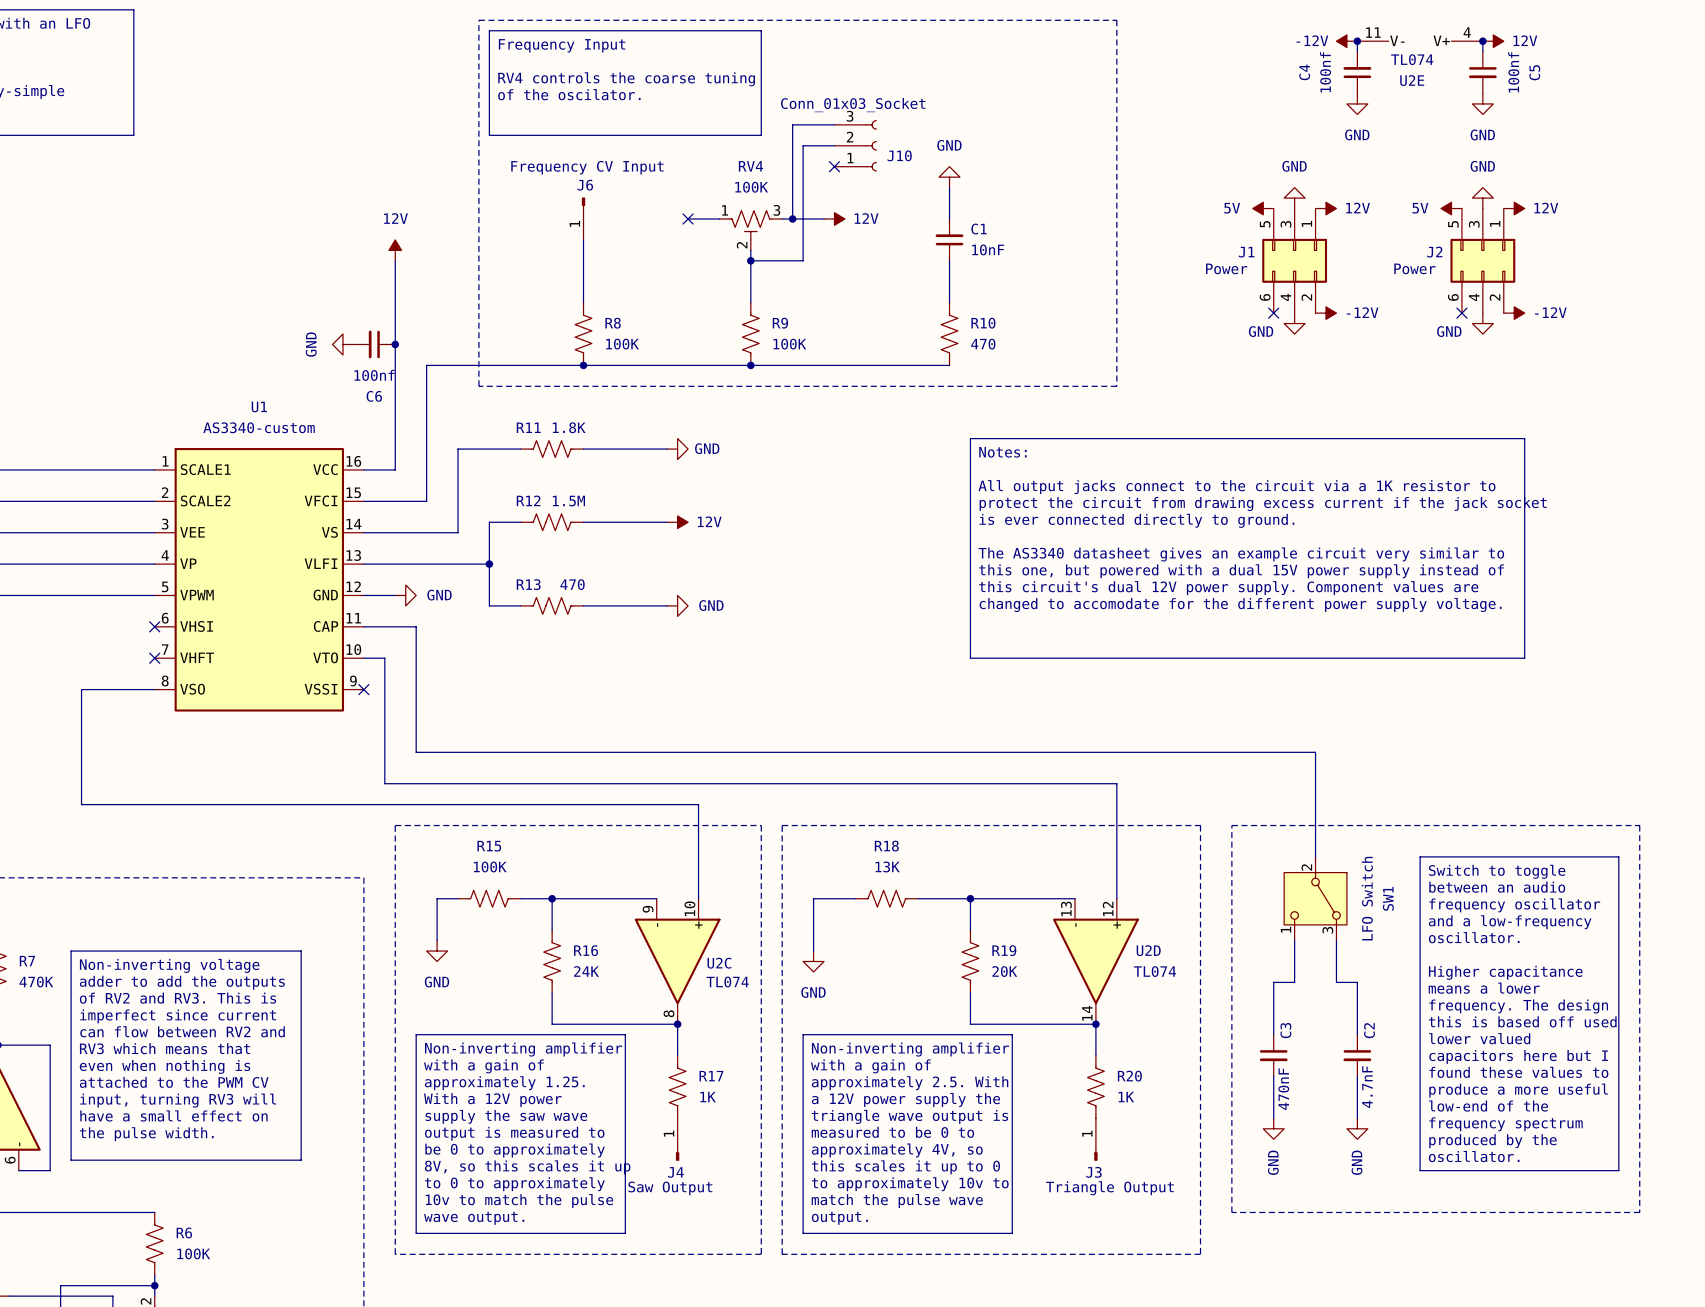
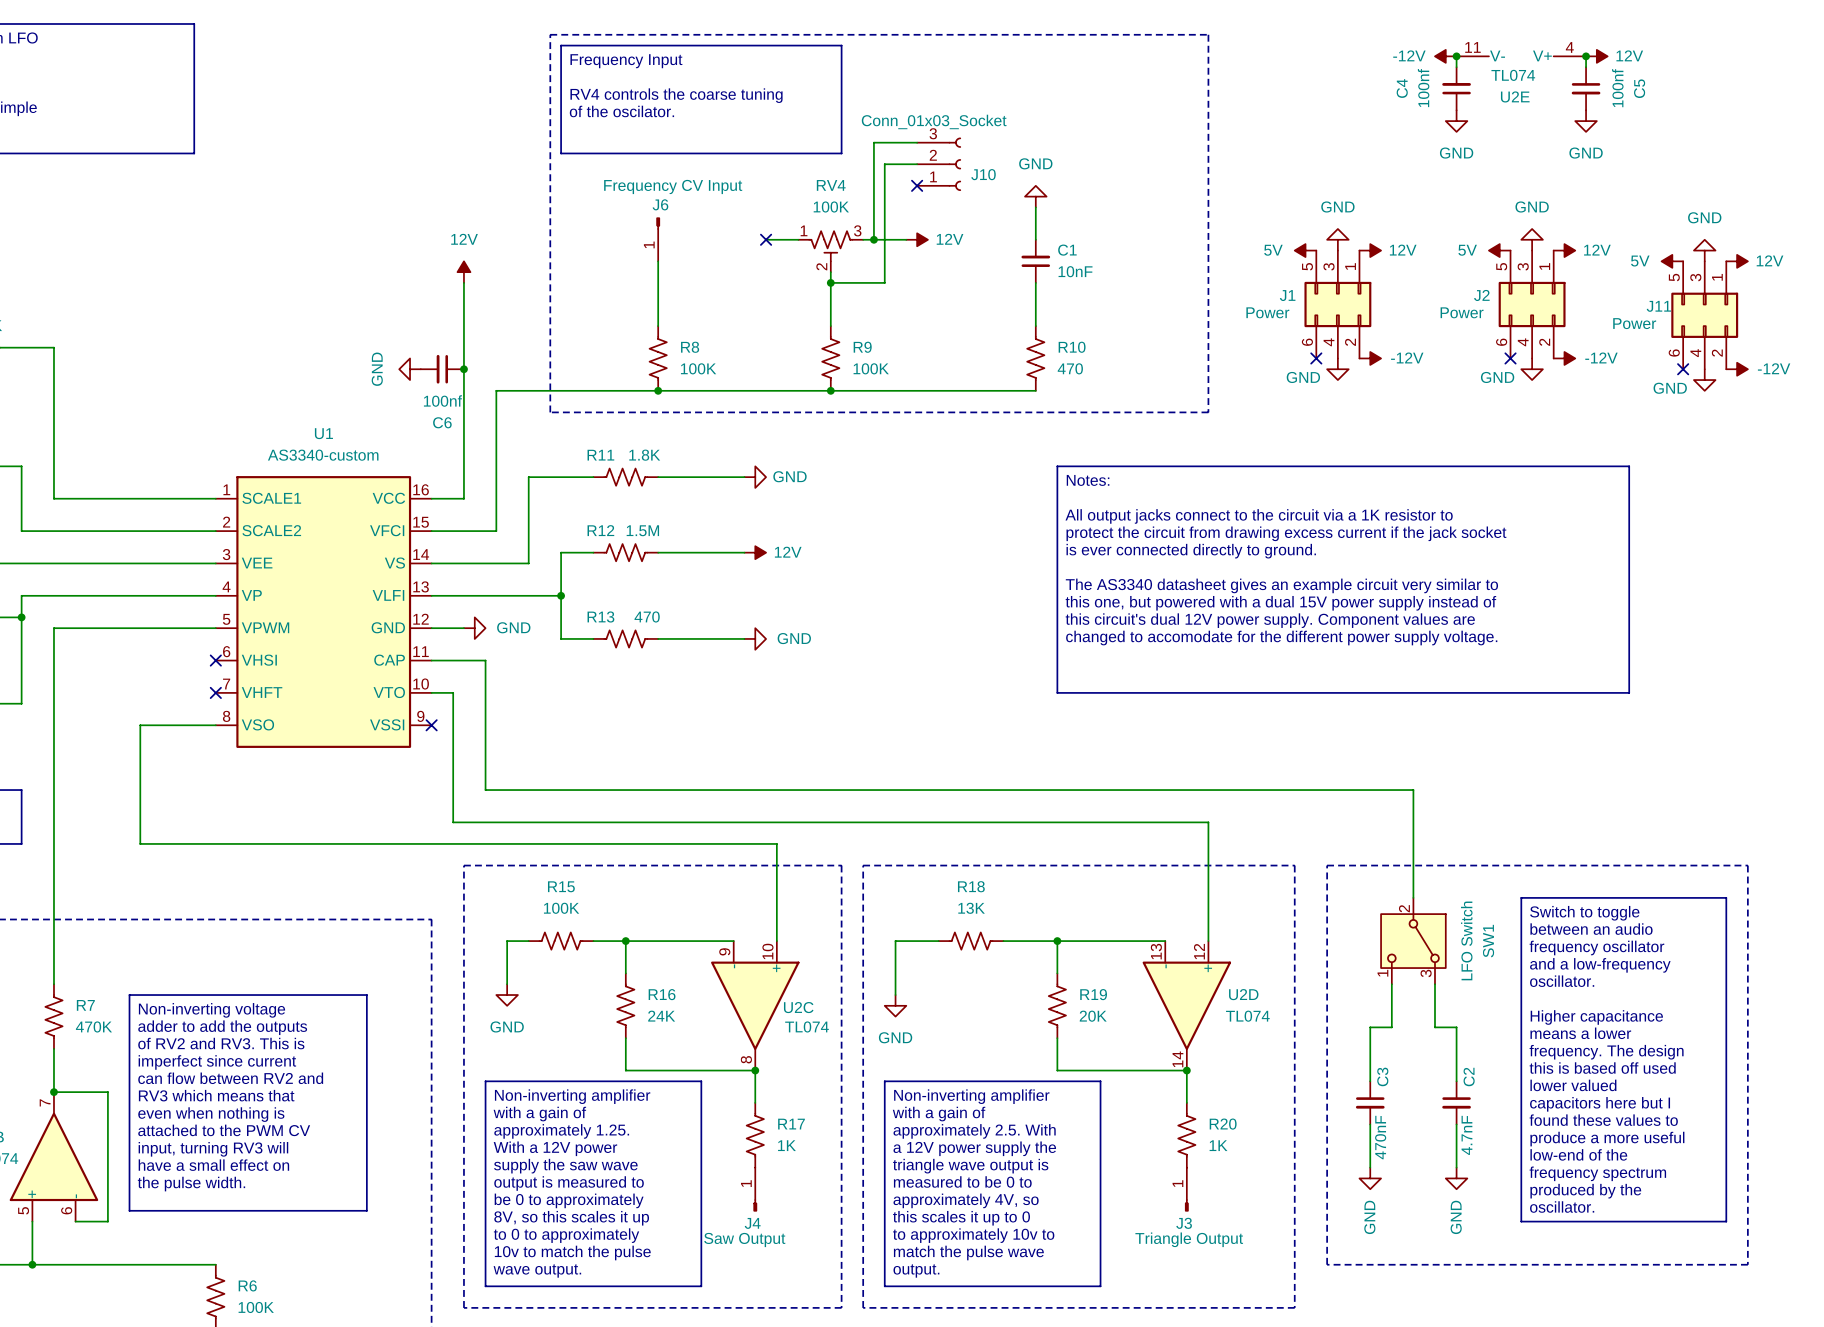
power symbol position: GND (1294, 198) -> GND (1337, 239)
power symbol position: GND (1482, 198) -> GND (1532, 239)
power symbol position: 5V (1263, 208) -> 5V (1305, 250)
power symbol position: 12V (1326, 208) -> 12V (1370, 250)
power symbol position: 5V (1451, 208) -> 5V (1499, 250)
power symbol position: 12V (1514, 208) -> 12V (1564, 250)
power symbol: none -> GND (1704, 250)
power symbol: none -> 5V (1672, 261)
power symbol: none -> 12V (1737, 261)
J1 position: (1294, 260) -> (1337, 304)
J2 position: (1482, 260) -> (1532, 304)
J11: none -> Power (1704, 315)
no-connect mark: (1273, 313) -> none
power symbol position: -12V (1326, 313) -> -12V (1370, 358)
no-connect mark: (1461, 313) -> none
power symbol position: -12V (1514, 313) -> -12V (1564, 358)
power symbol position: GND (1294, 323) -> GND (1337, 369)
power symbol position: GND (1482, 323) -> GND (1532, 369)
no-connect mark: none -> (1316, 358)
no-connect mark: none -> (1510, 358)
no-connect mark: none -> (1683, 369)
power symbol: none -> -12V (1737, 369)
power symbol: none -> GND (1704, 380)

